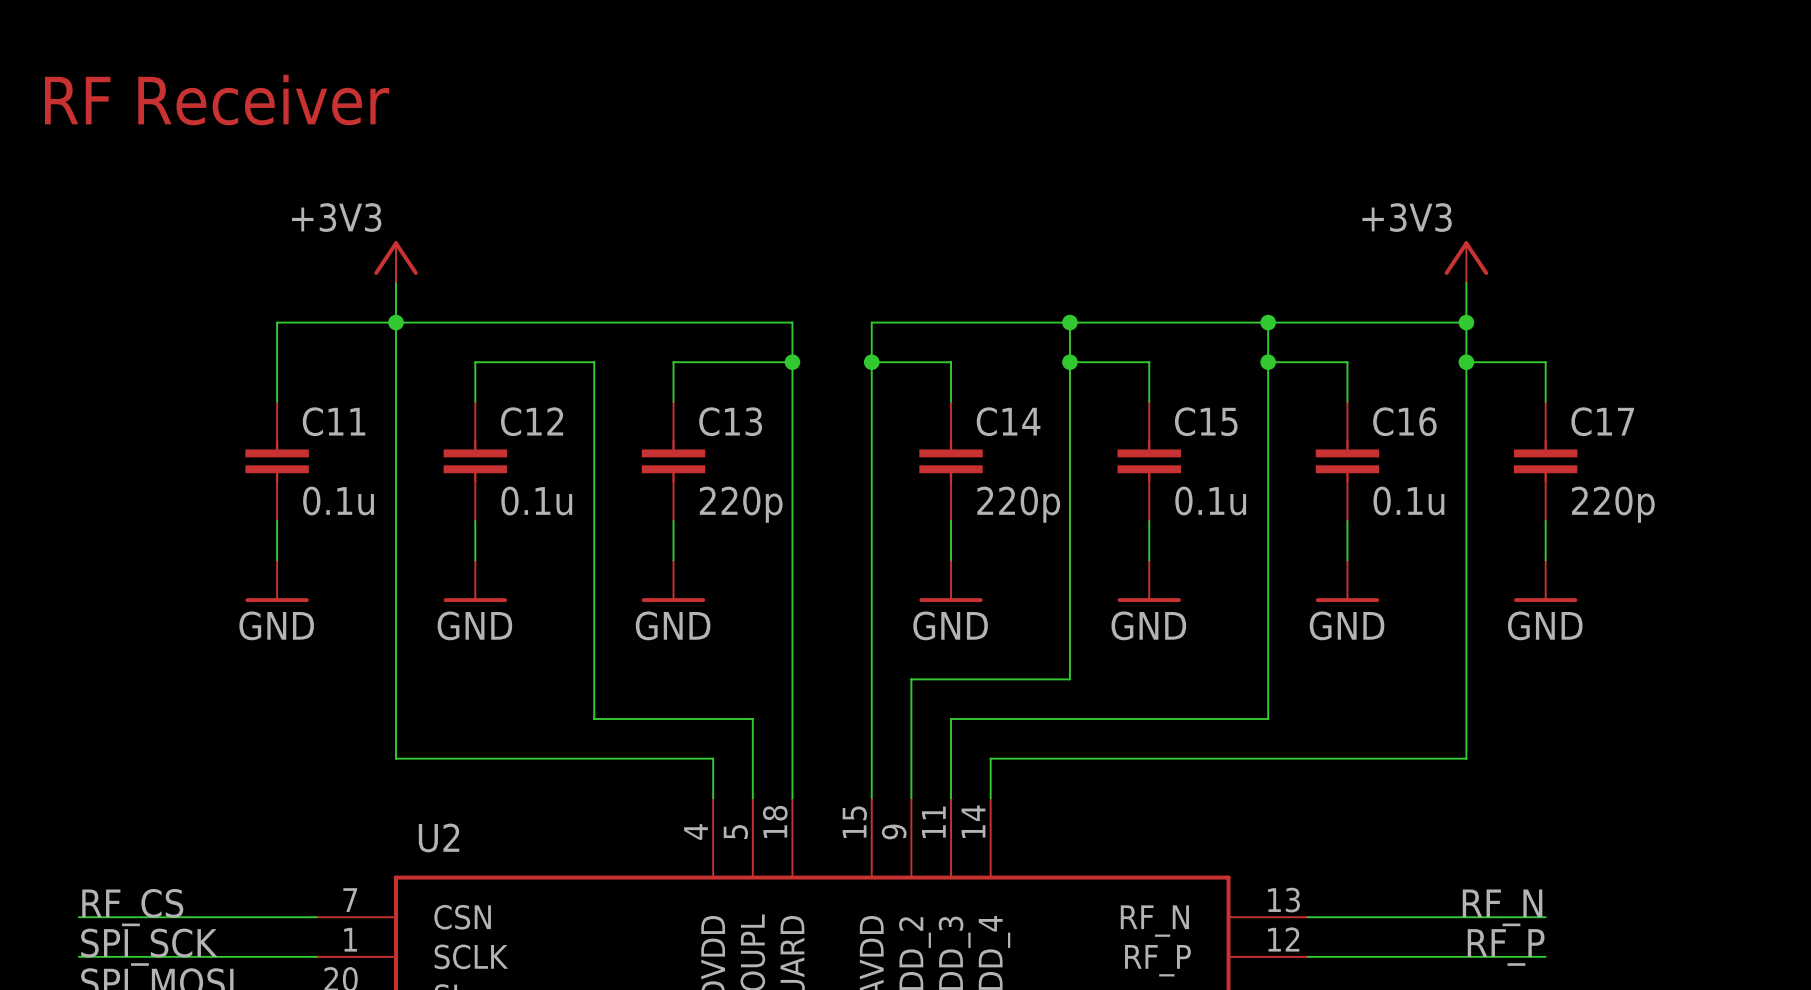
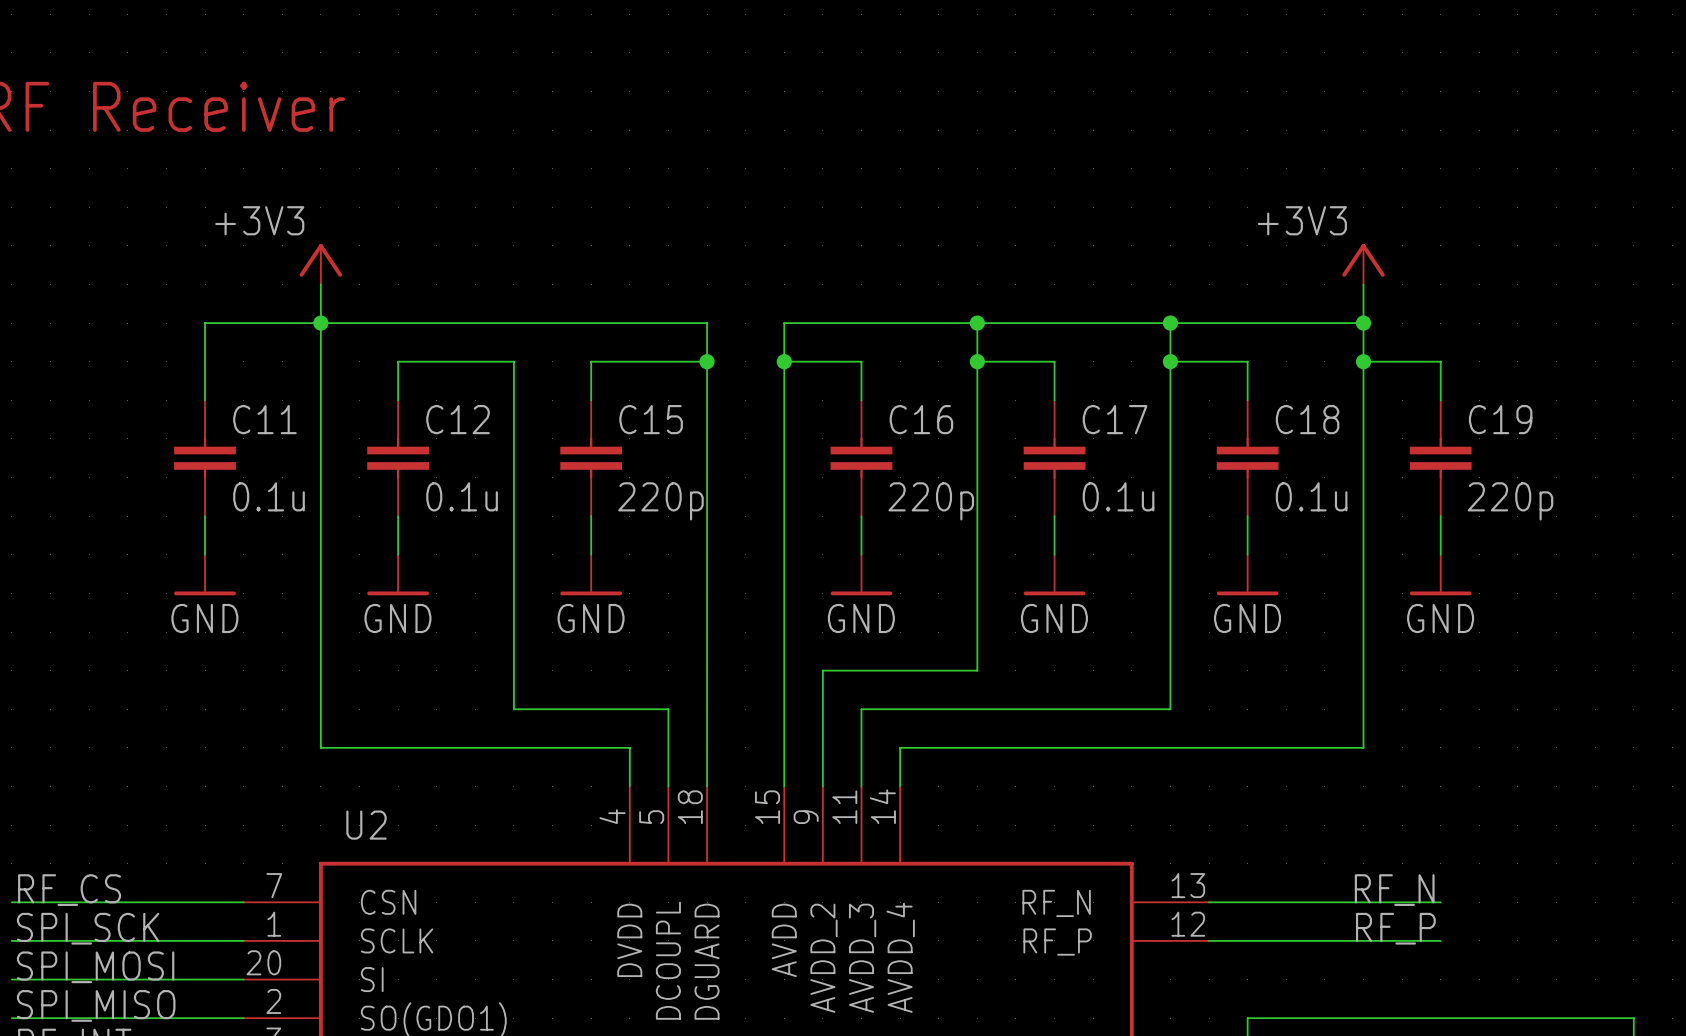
C13 name: C13 (730, 421) -> C15 (651, 419)
C14 name: C14 (1008, 421) -> C16 (921, 419)
C15 name: C15 (1206, 421) -> C17 (1115, 419)
C16 name: C16 (1404, 421) -> C18 (1307, 419)
C17 name: C17 (1602, 421) -> C19 (1500, 419)

